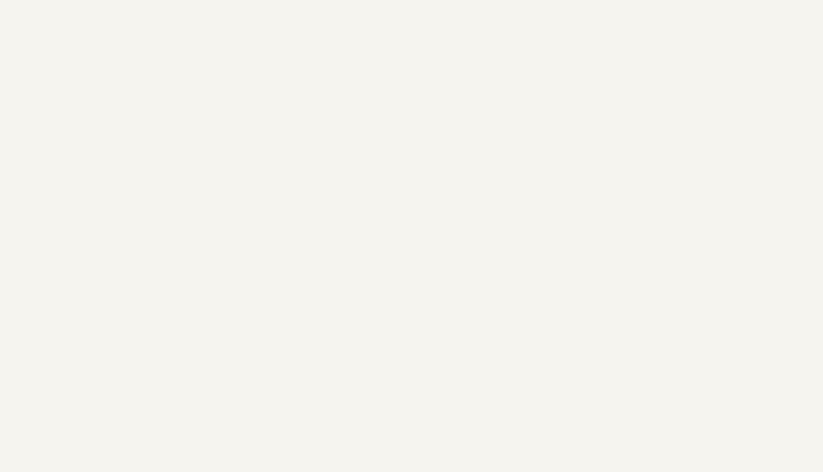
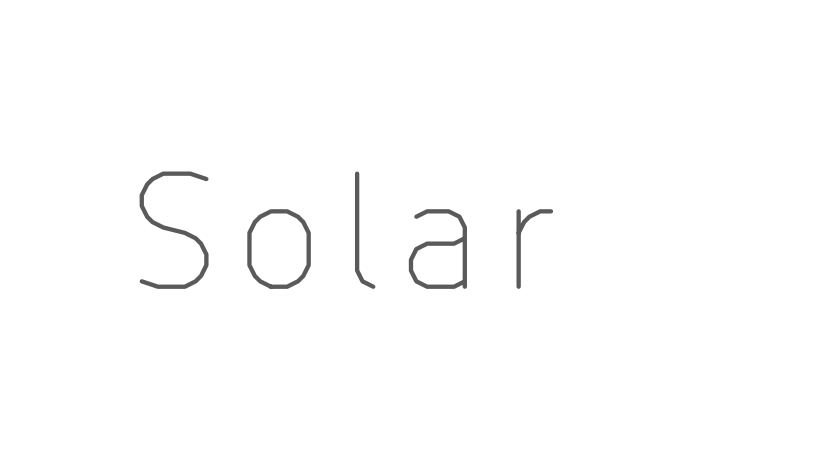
text: none -> Solar (346, 230)

